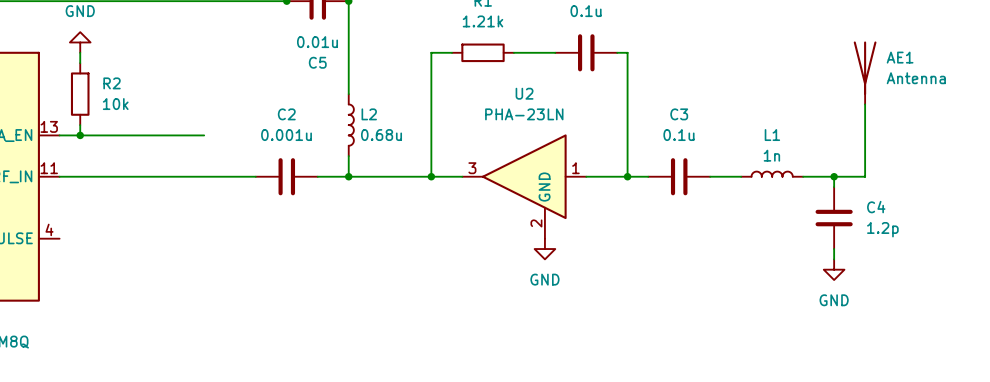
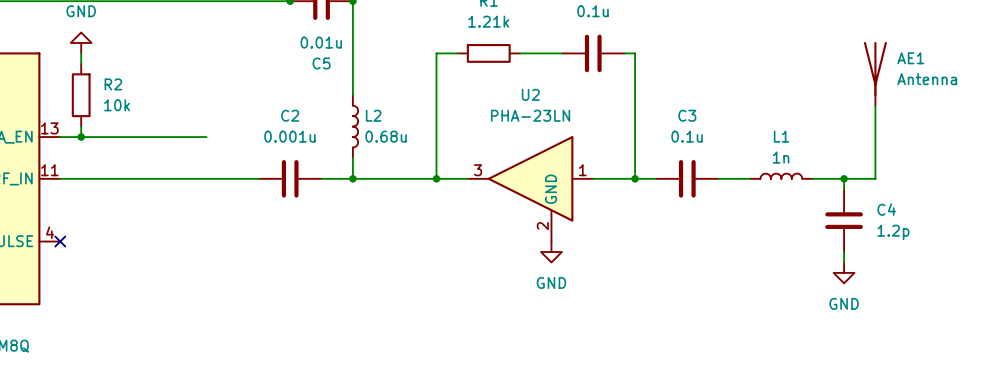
no-connect mark: none -> (60, 241)

